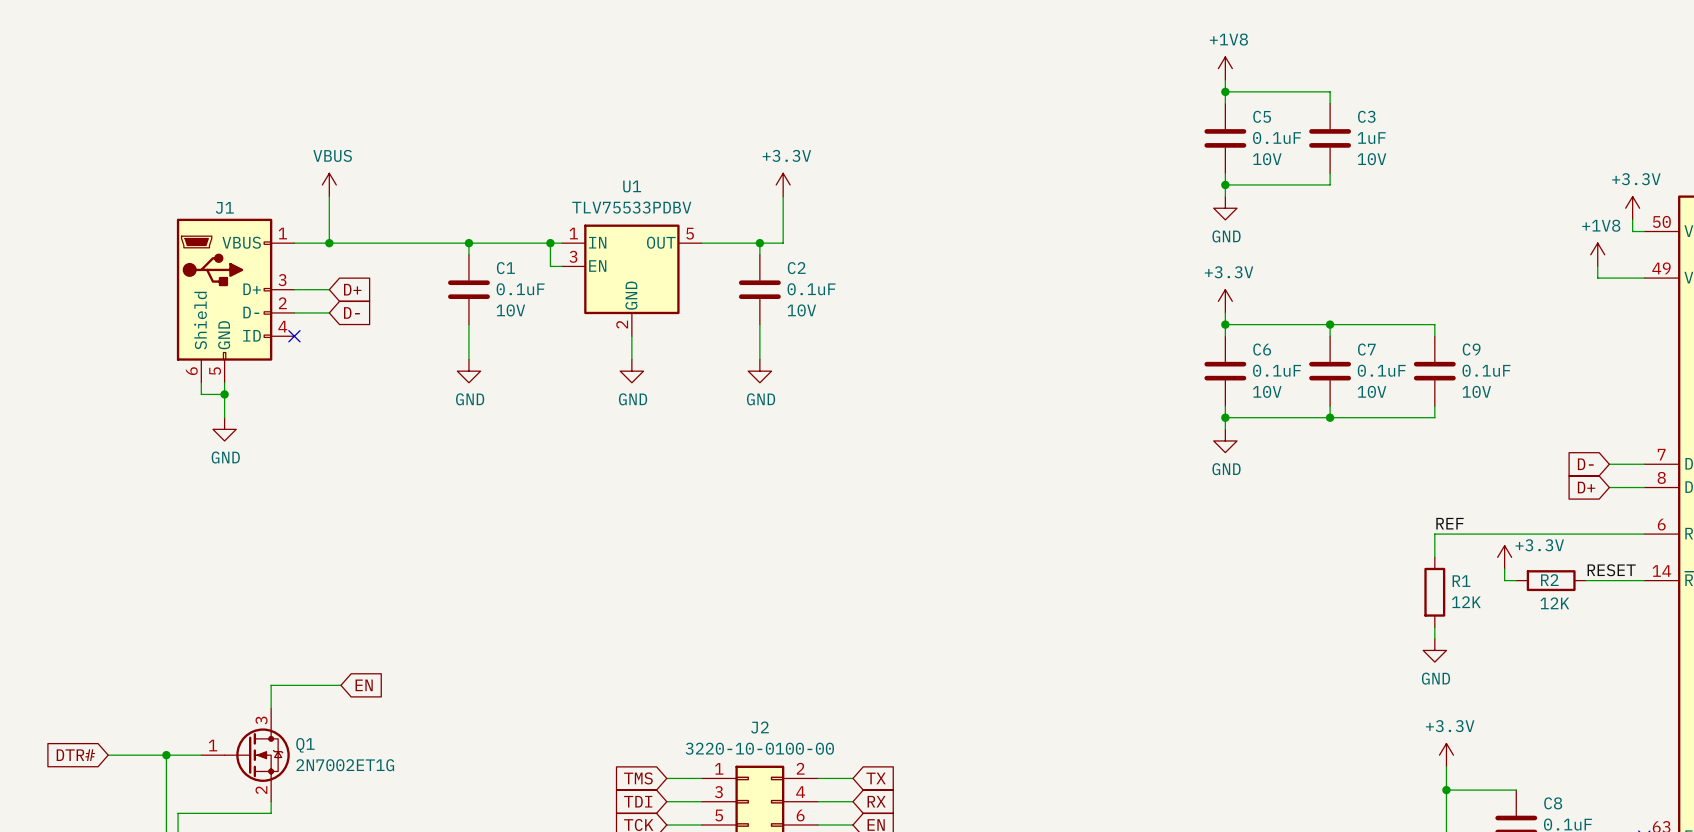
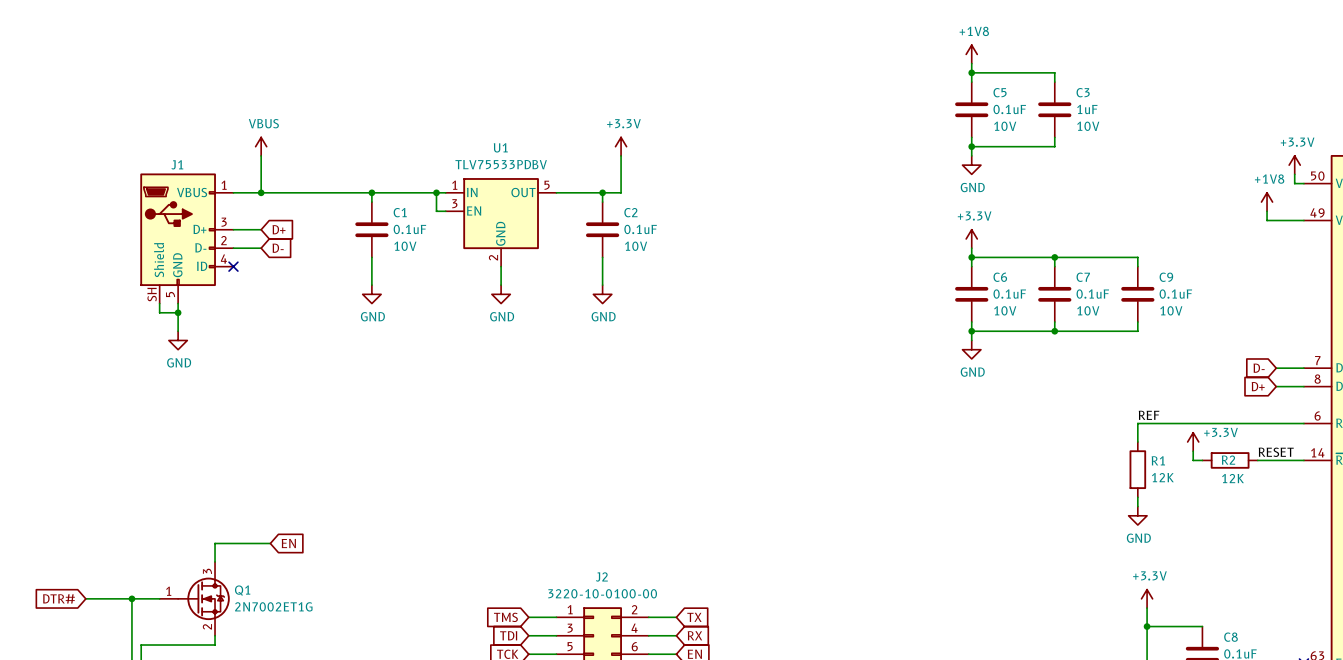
J1 pin number: 6 (191, 371) -> SH (152, 294)

